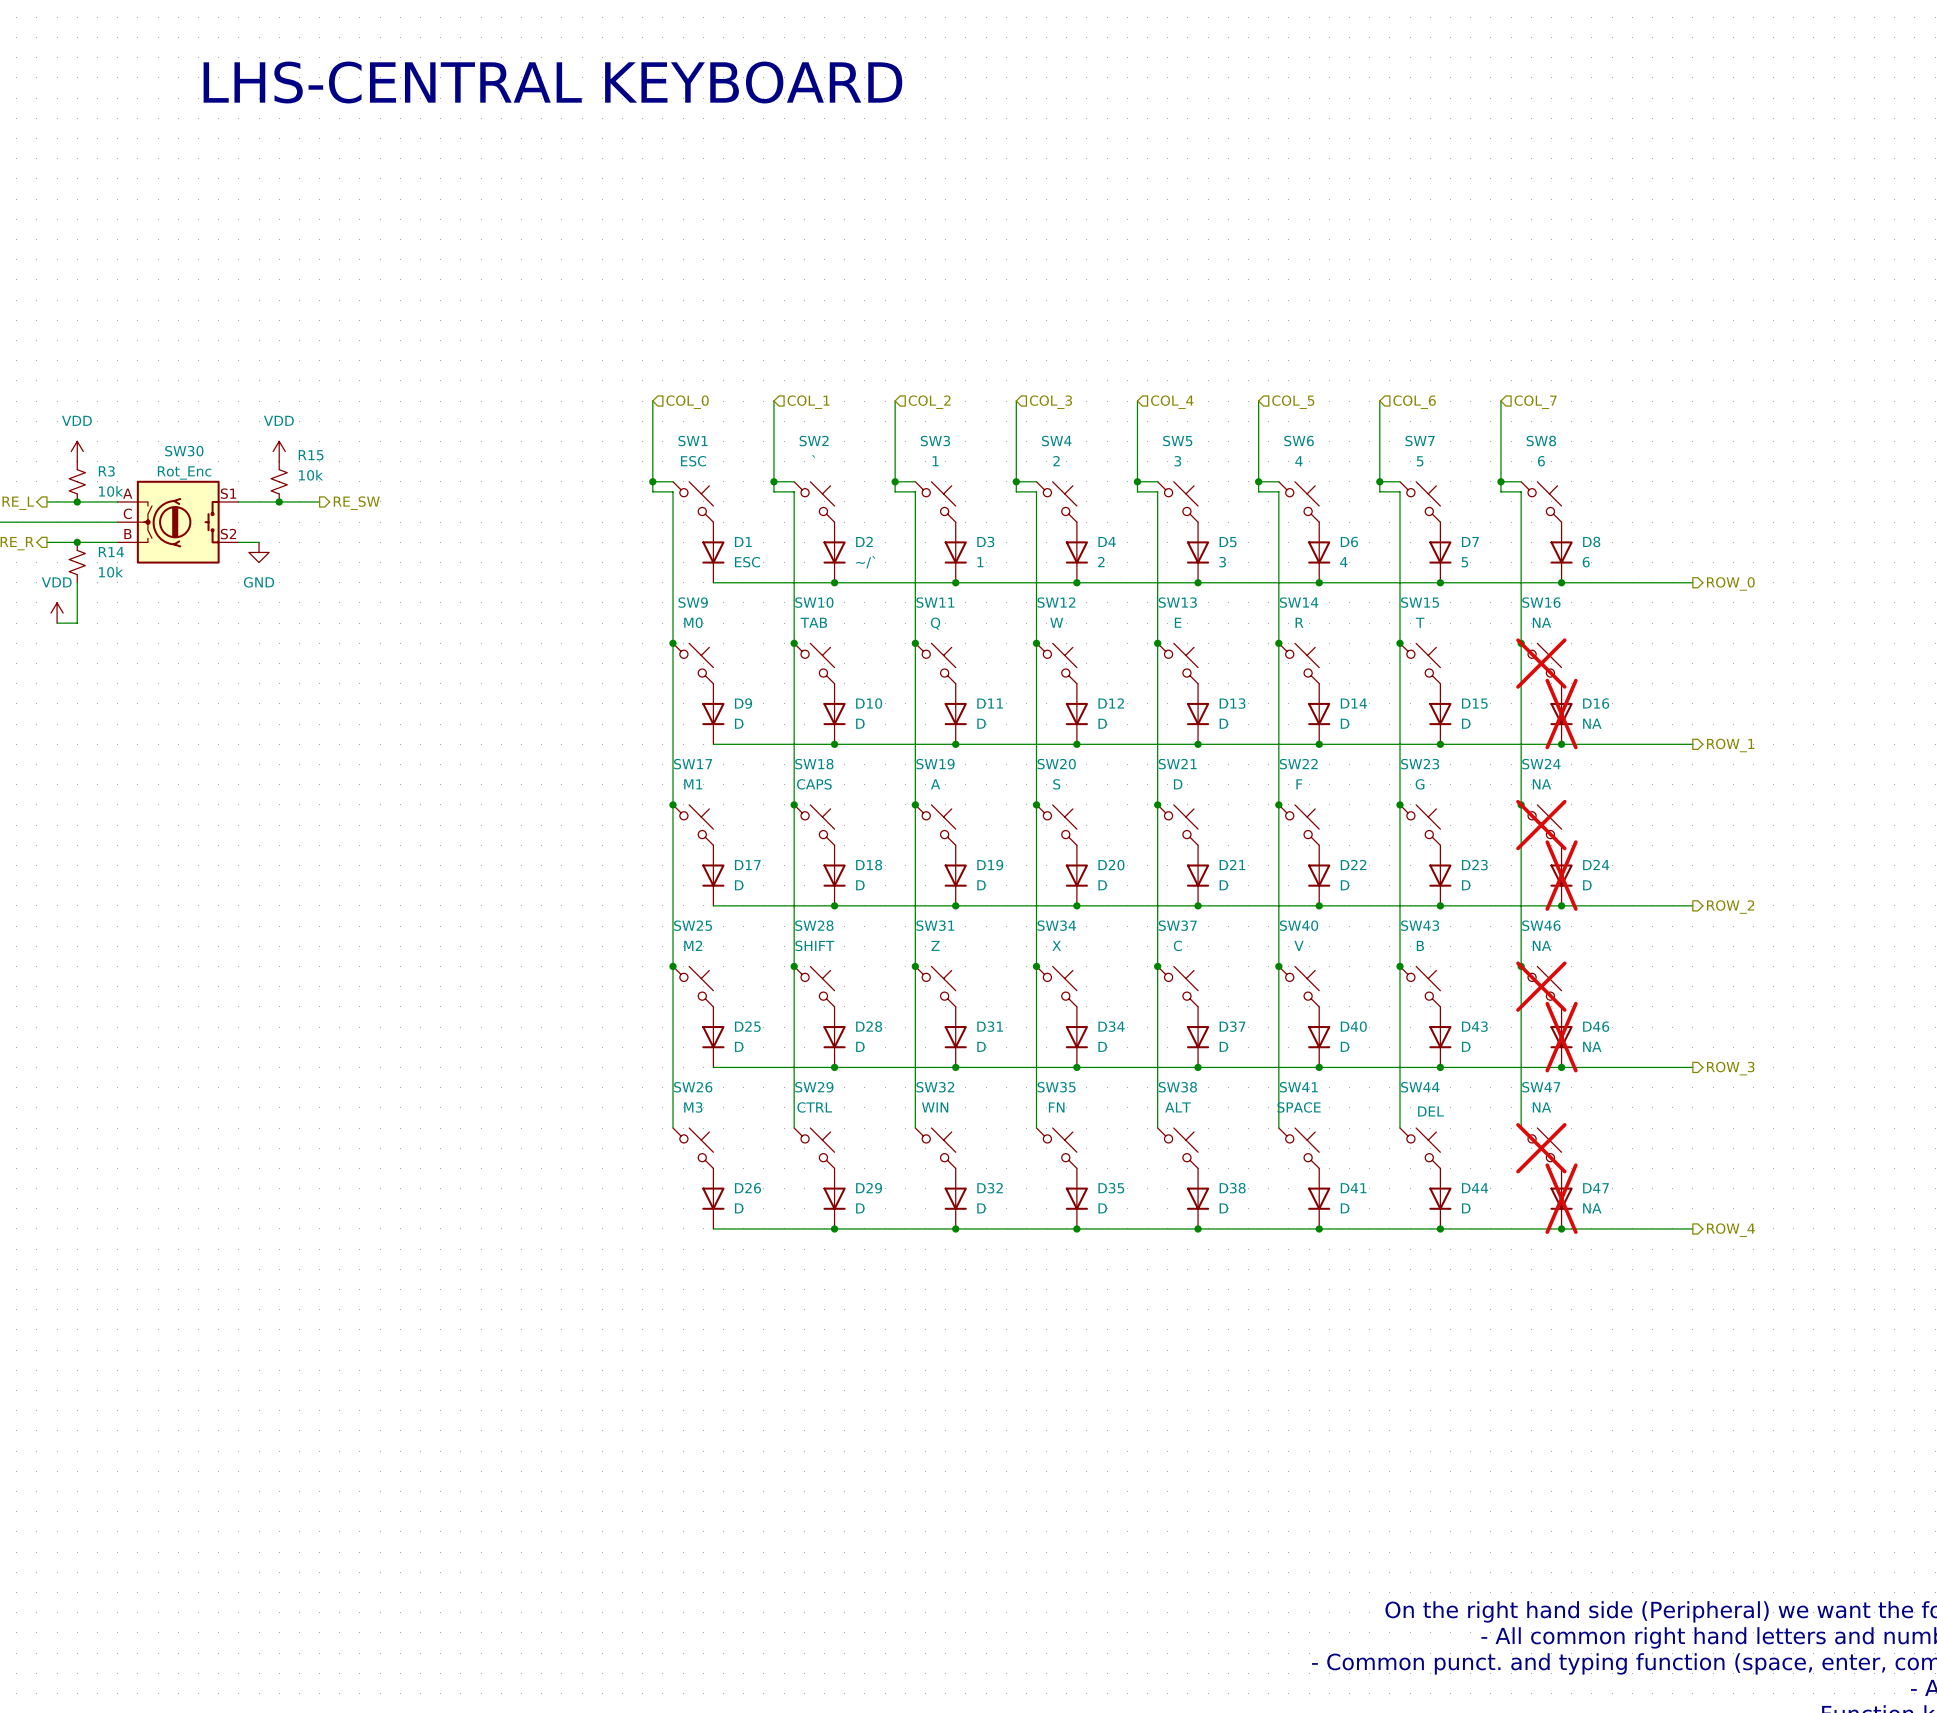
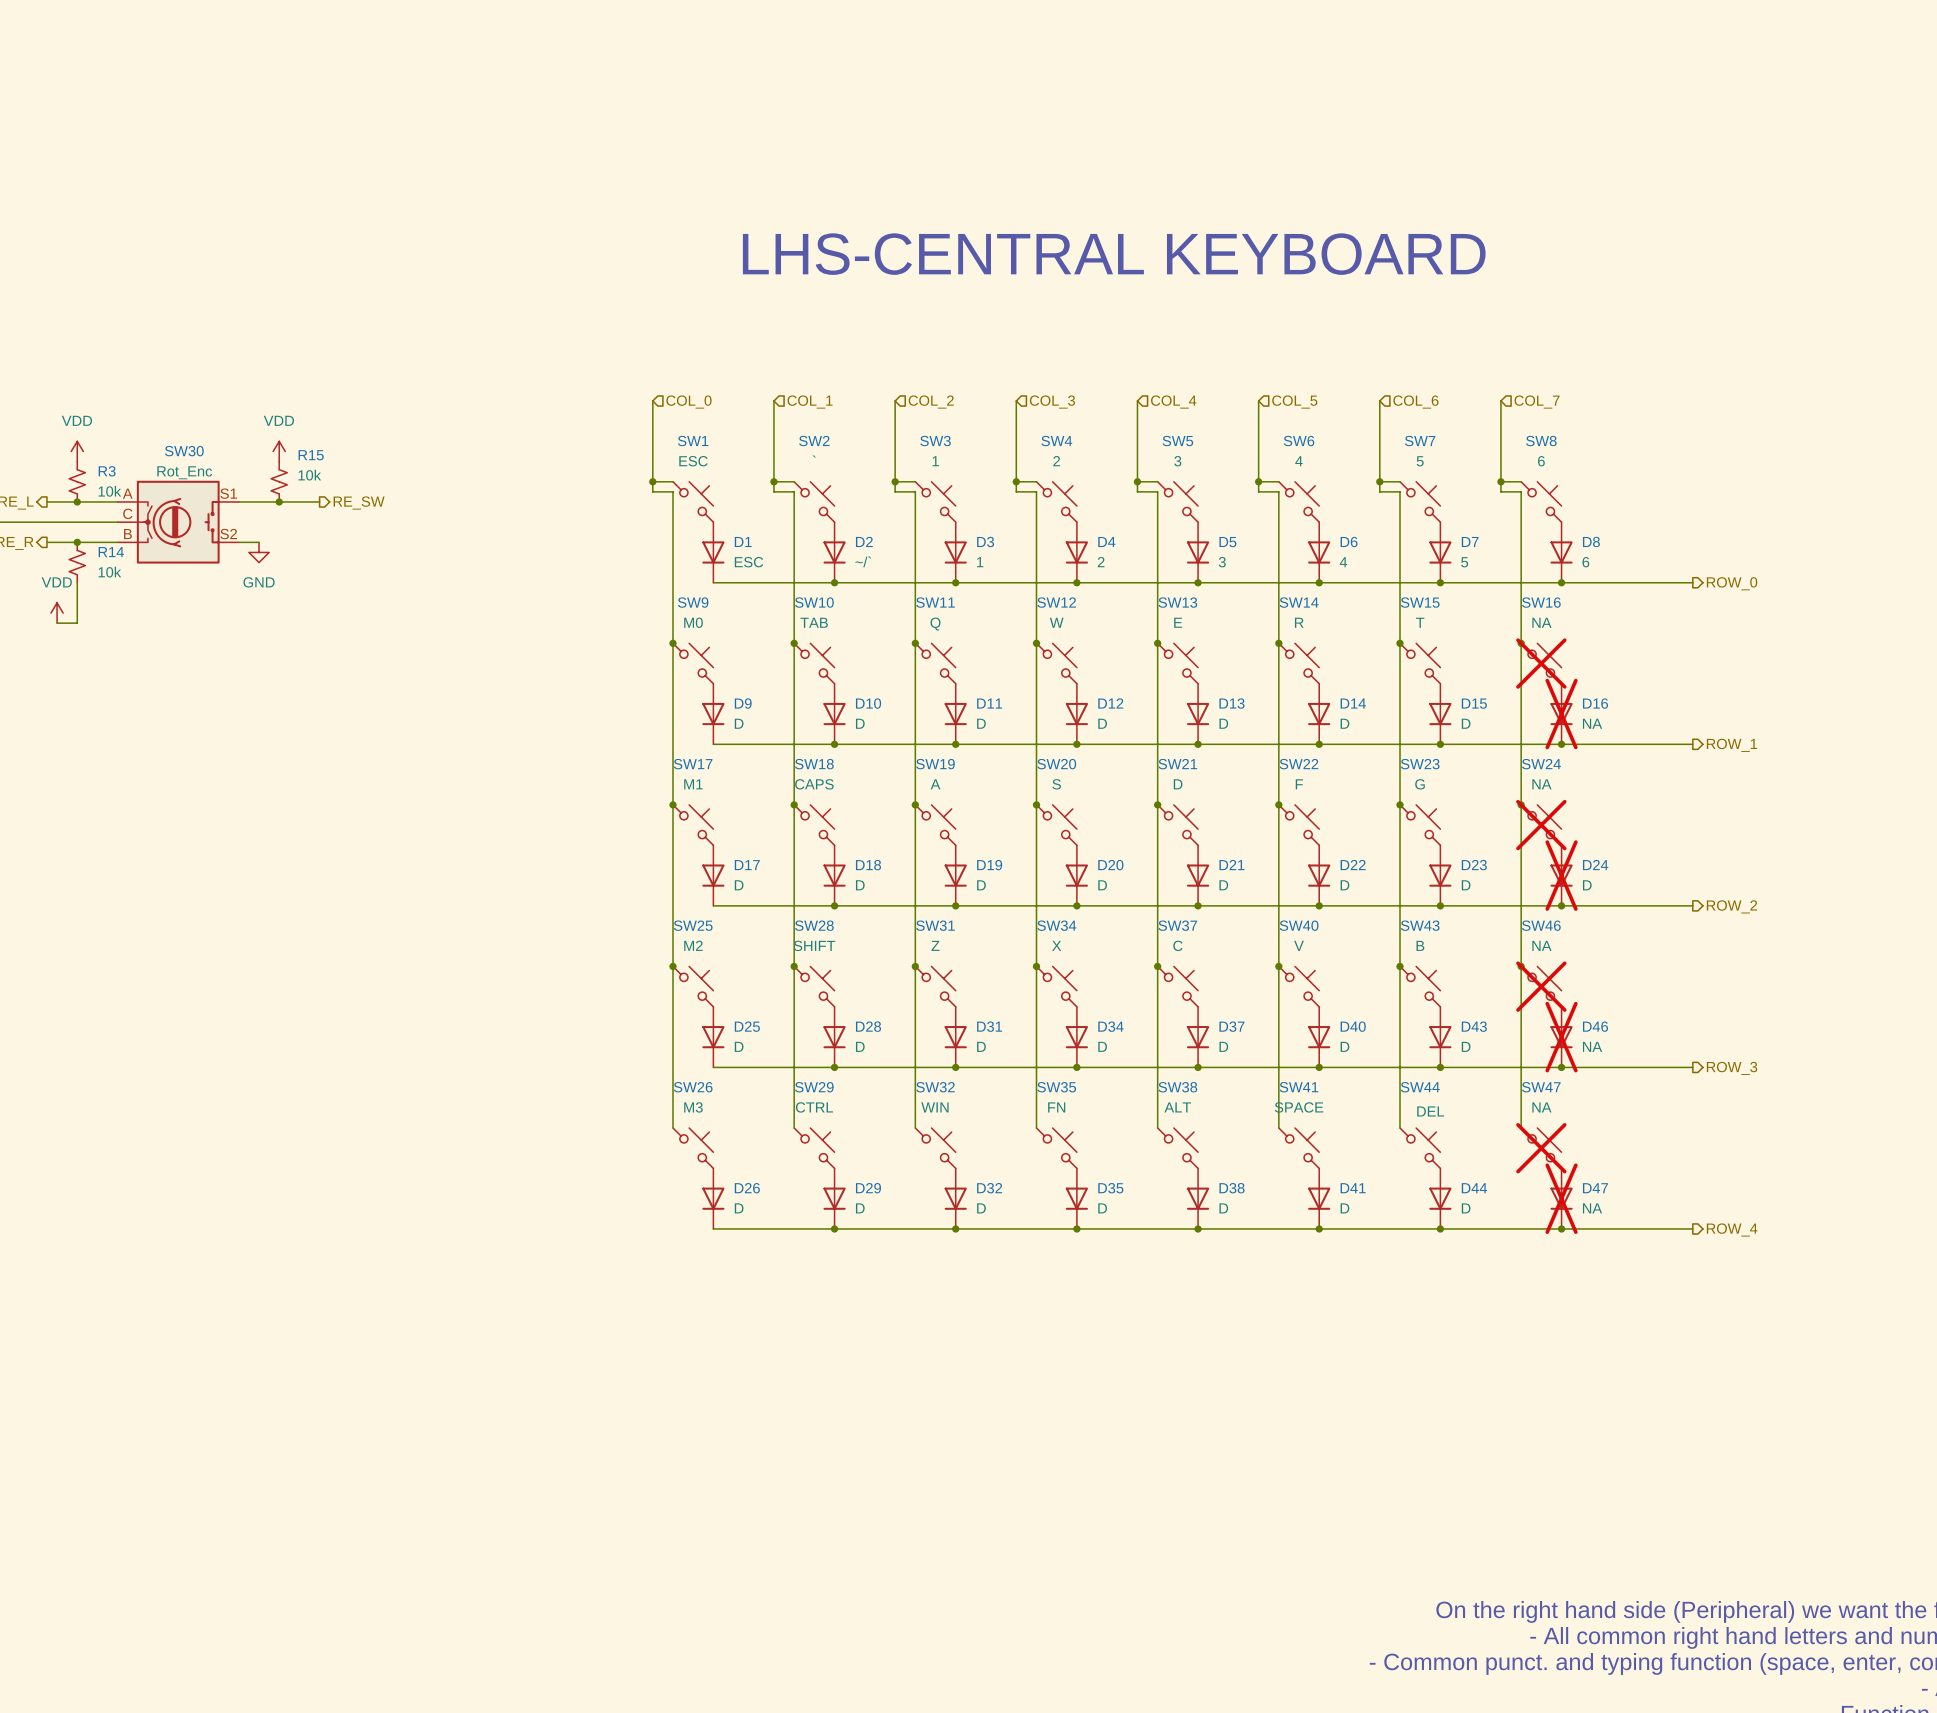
text: LHS-CENTRAL KEYBOARD (552, 82) -> none
text: none -> LHS-CENTRAL KEYBOARD (1114, 254)

